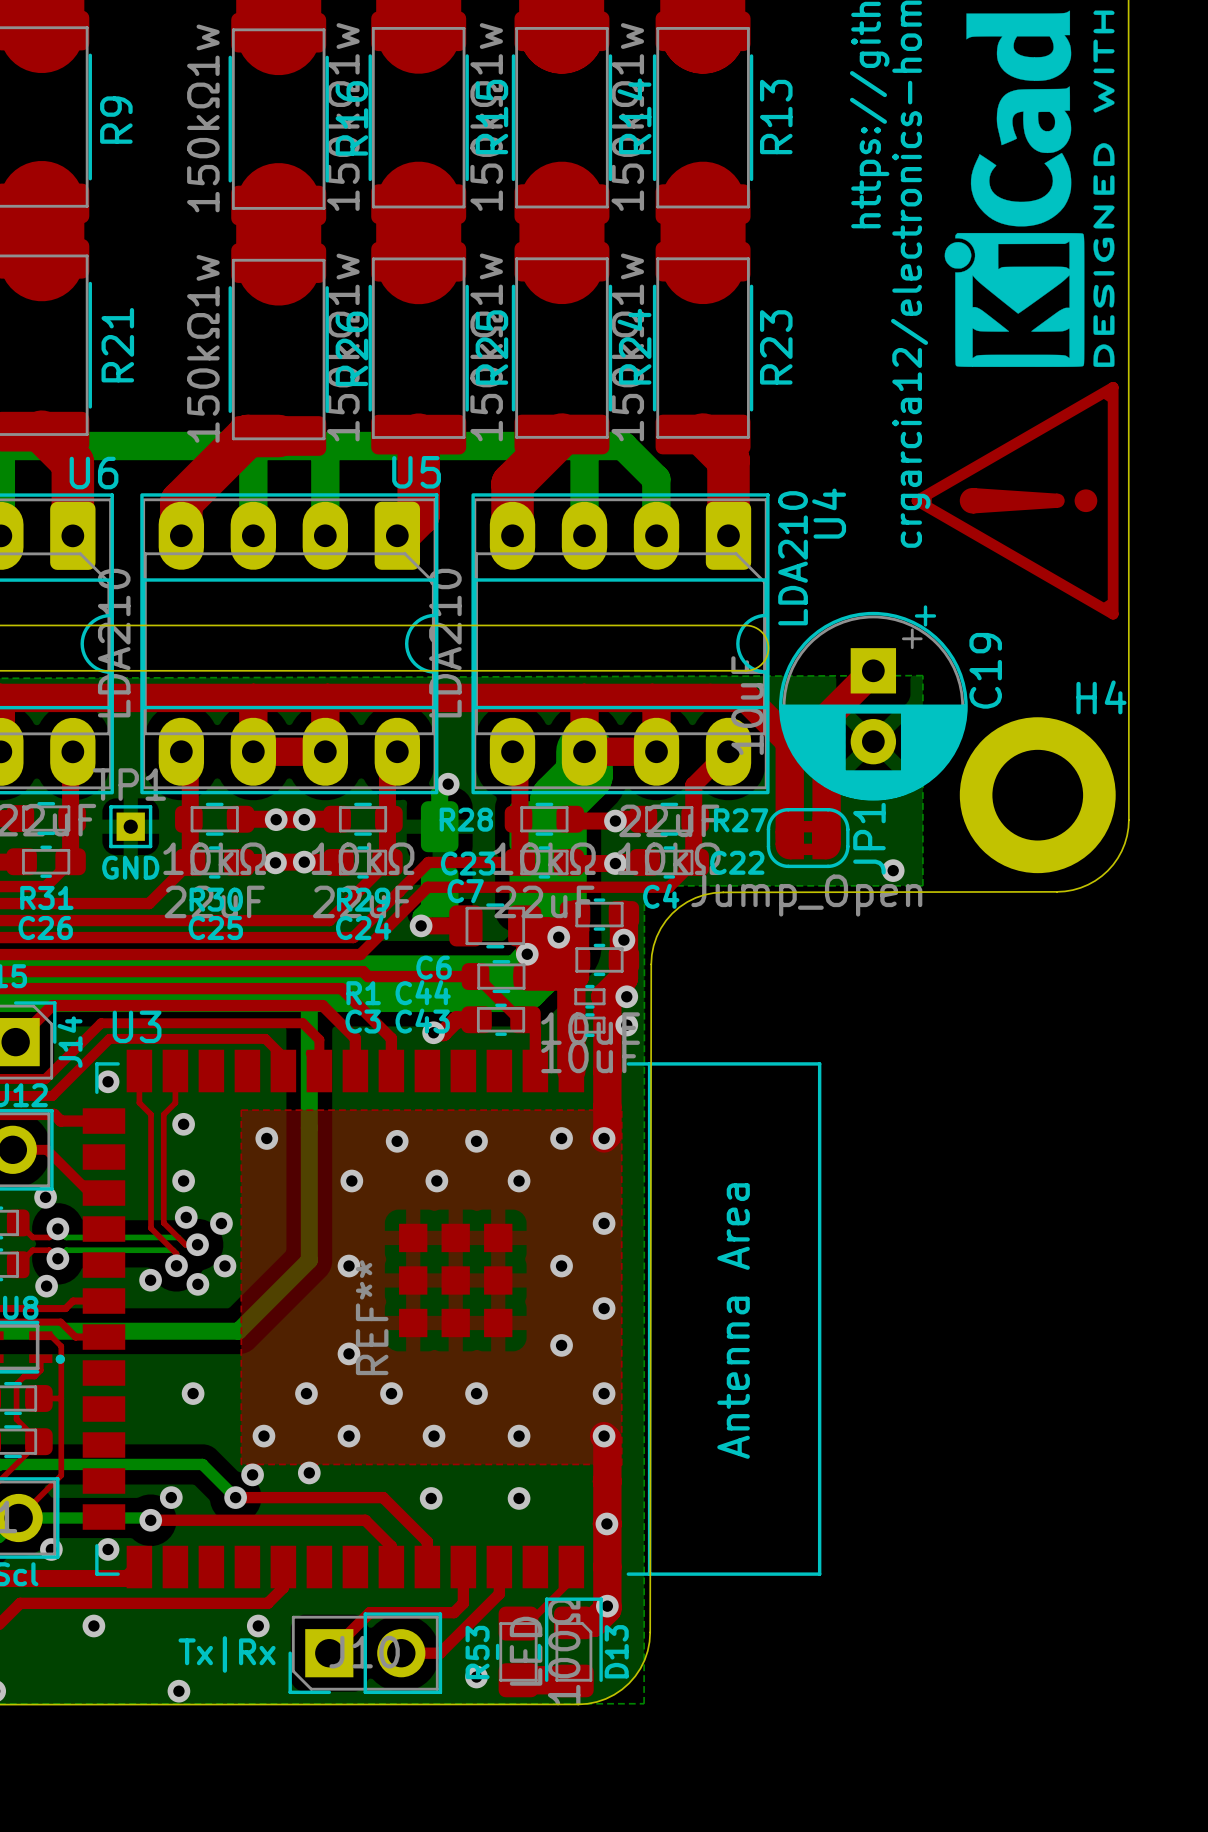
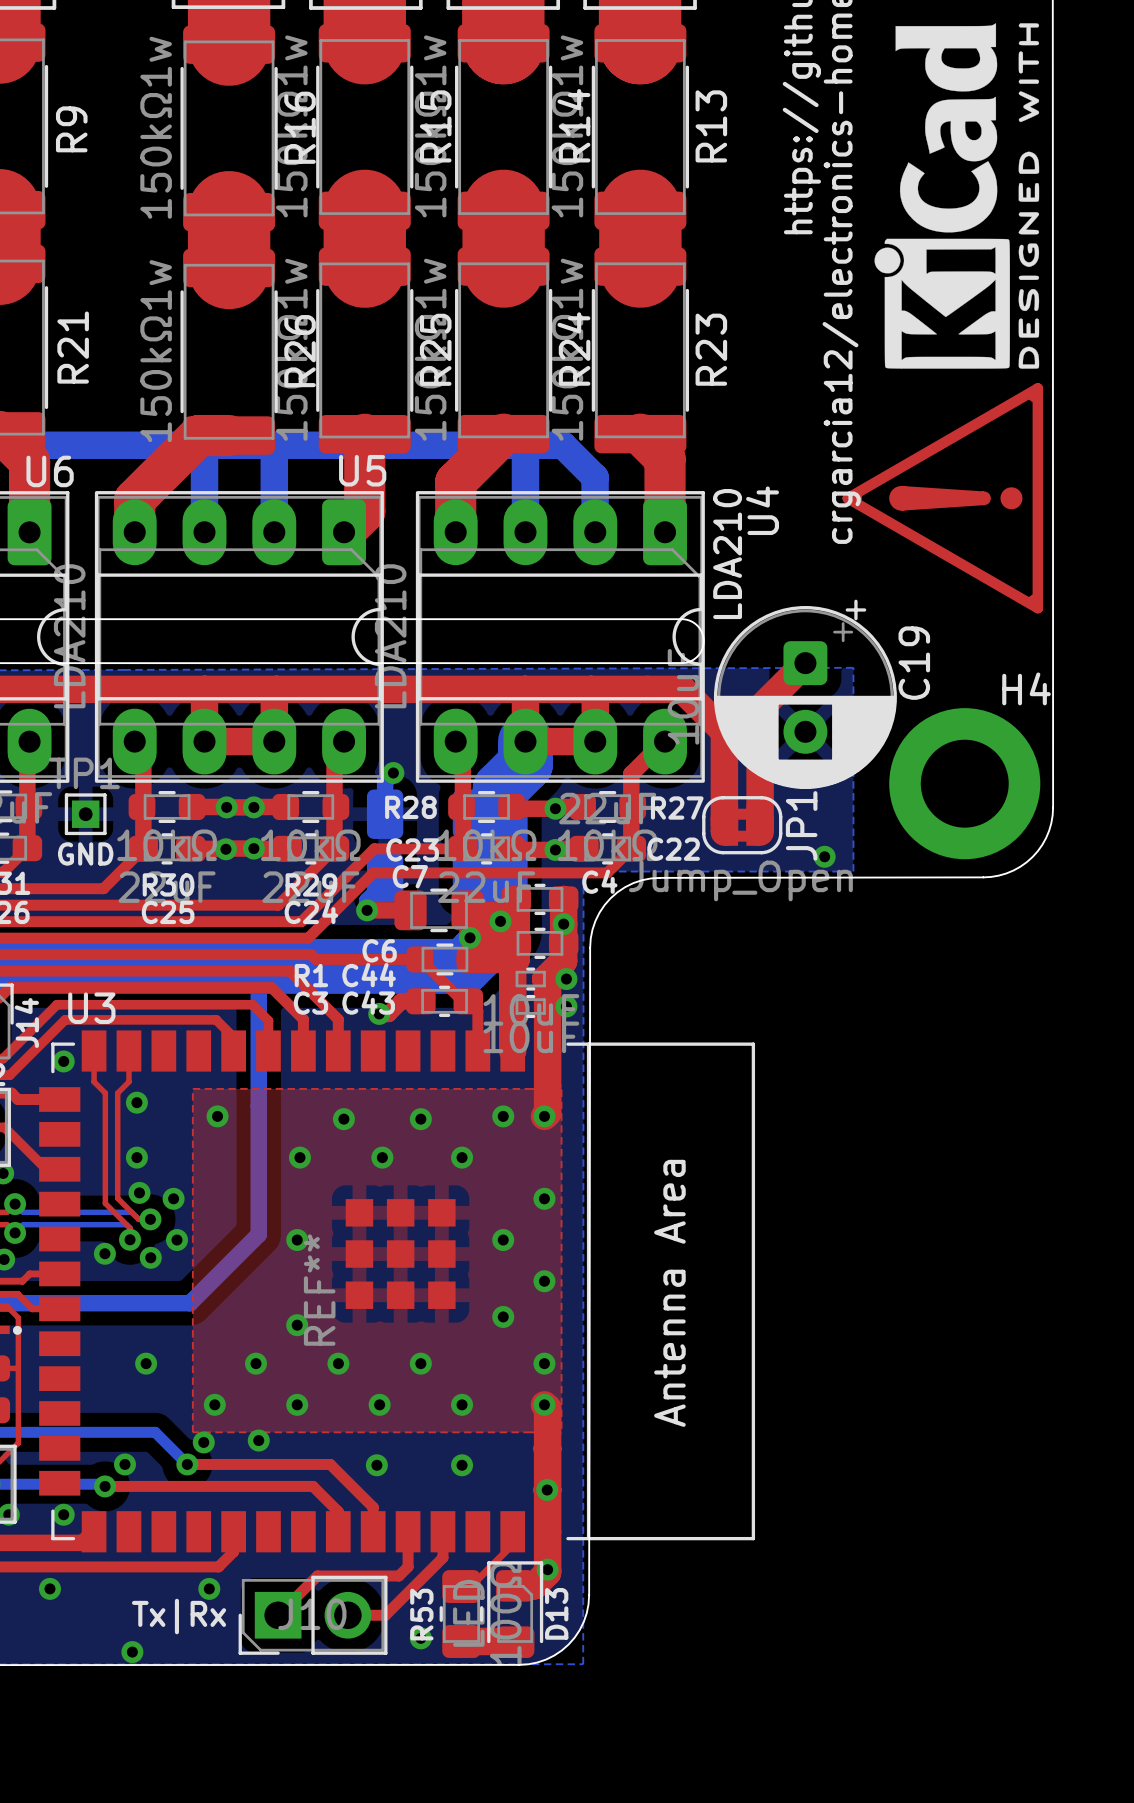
C19 footprint: [778, 605, 968, 801] -> [713, 599, 897, 789]

